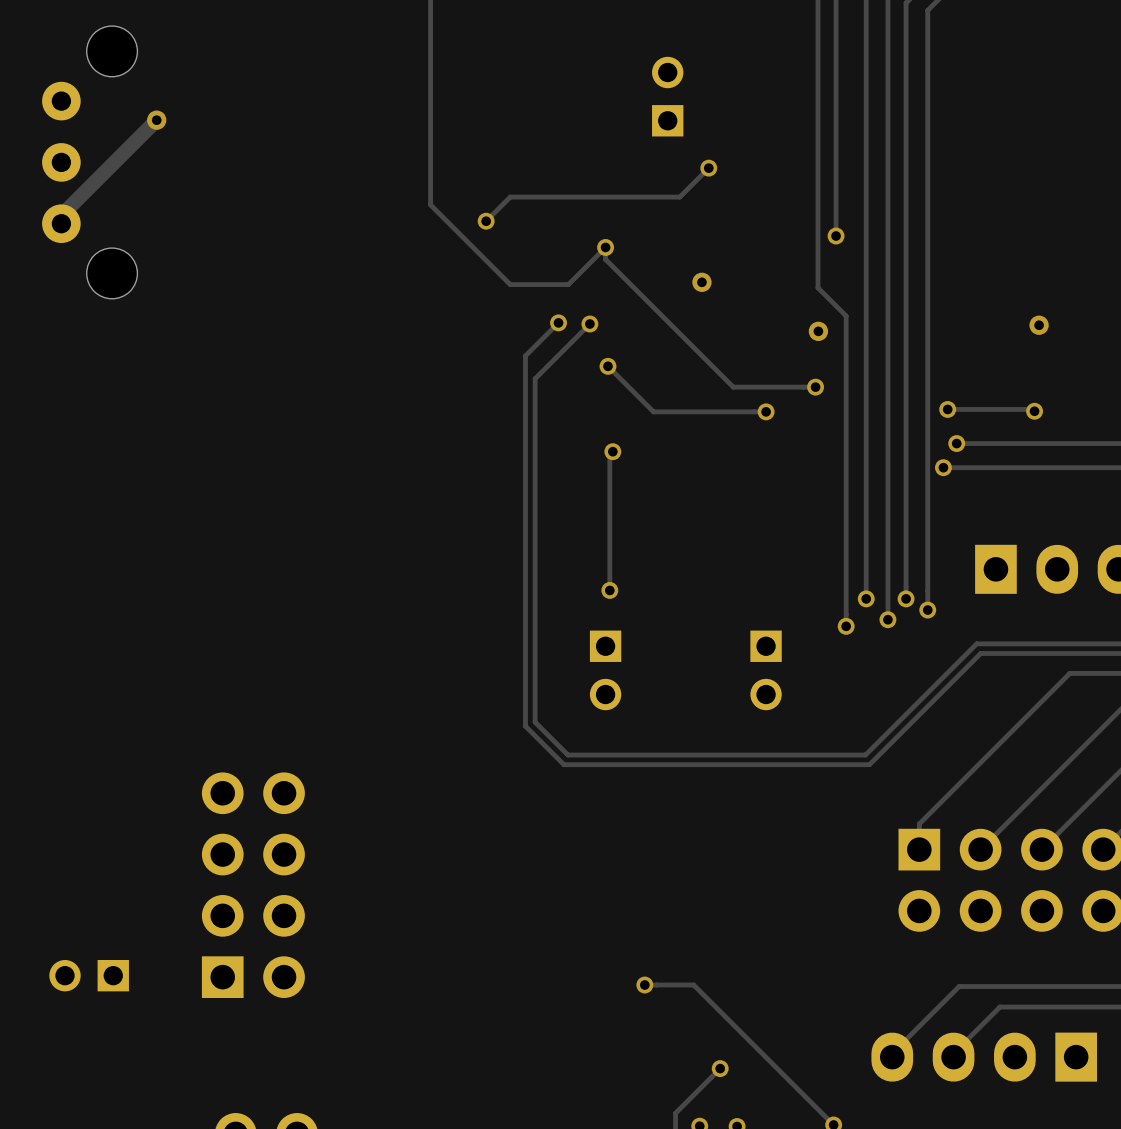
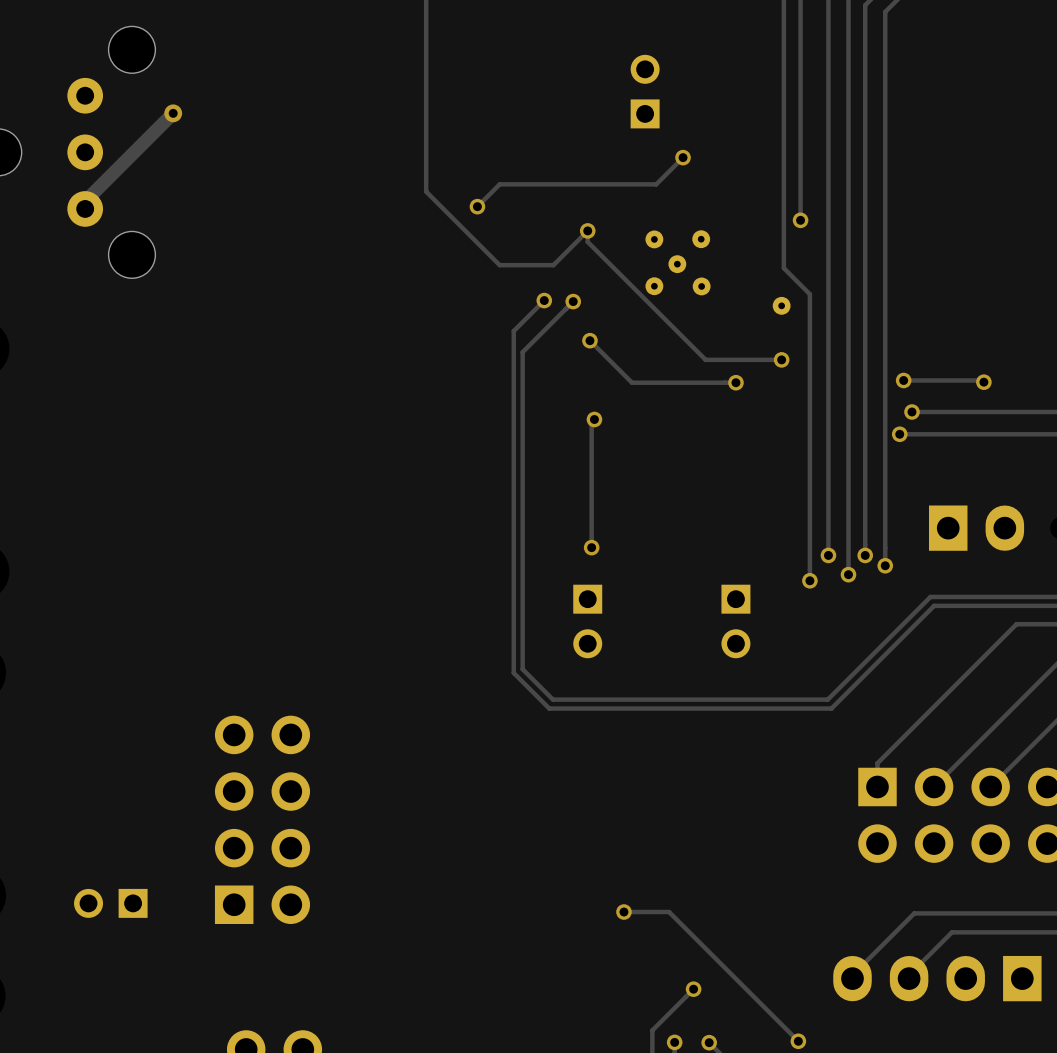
part: none -> (654, 239)
part: none -> (701, 239)
via: (701, 282) -> none
part: none -> (677, 264)
part: none -> (654, 286)
part: none -> (701, 286)
via: (1039, 325) -> none
part: none -> (781, 305)
via: (818, 331) -> none

